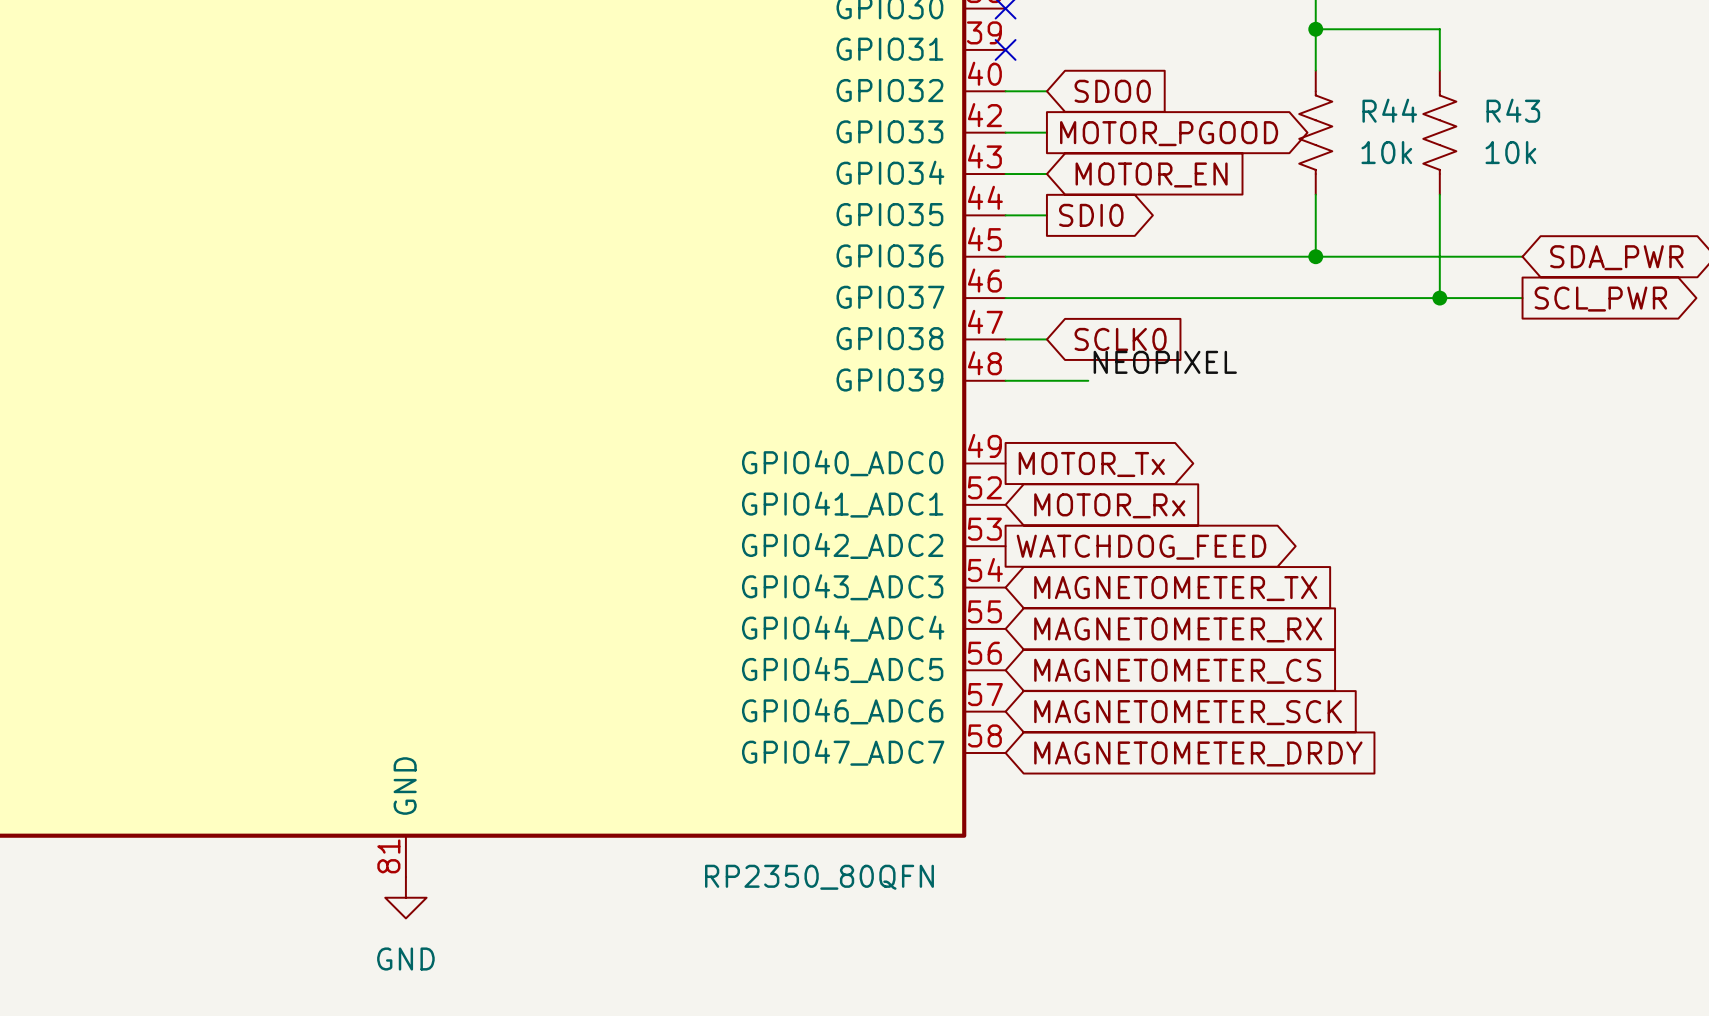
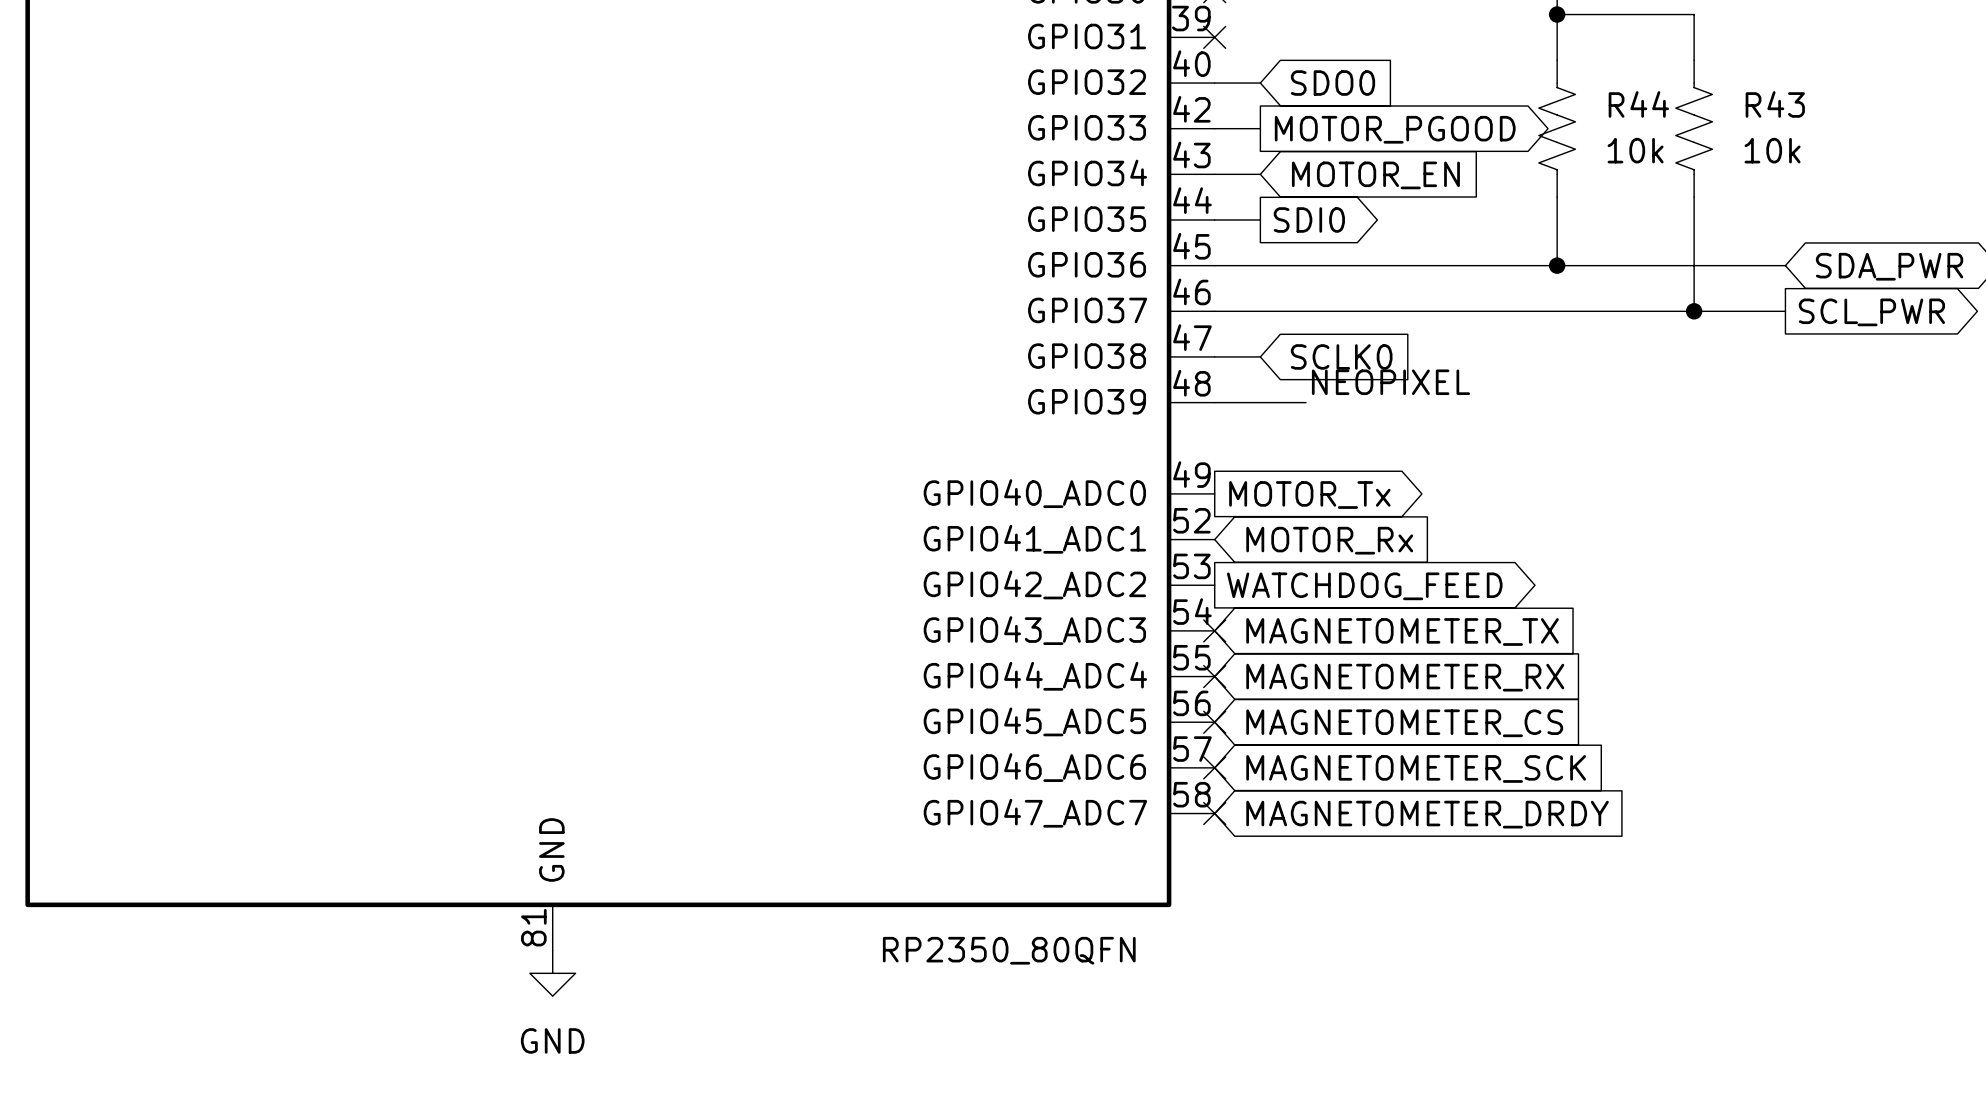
no-connect mark: none -> (1214, 630)
no-connect mark: none -> (1214, 676)
no-connect mark: none -> (1214, 722)
no-connect mark: none -> (1214, 767)
no-connect mark: none -> (1214, 813)

